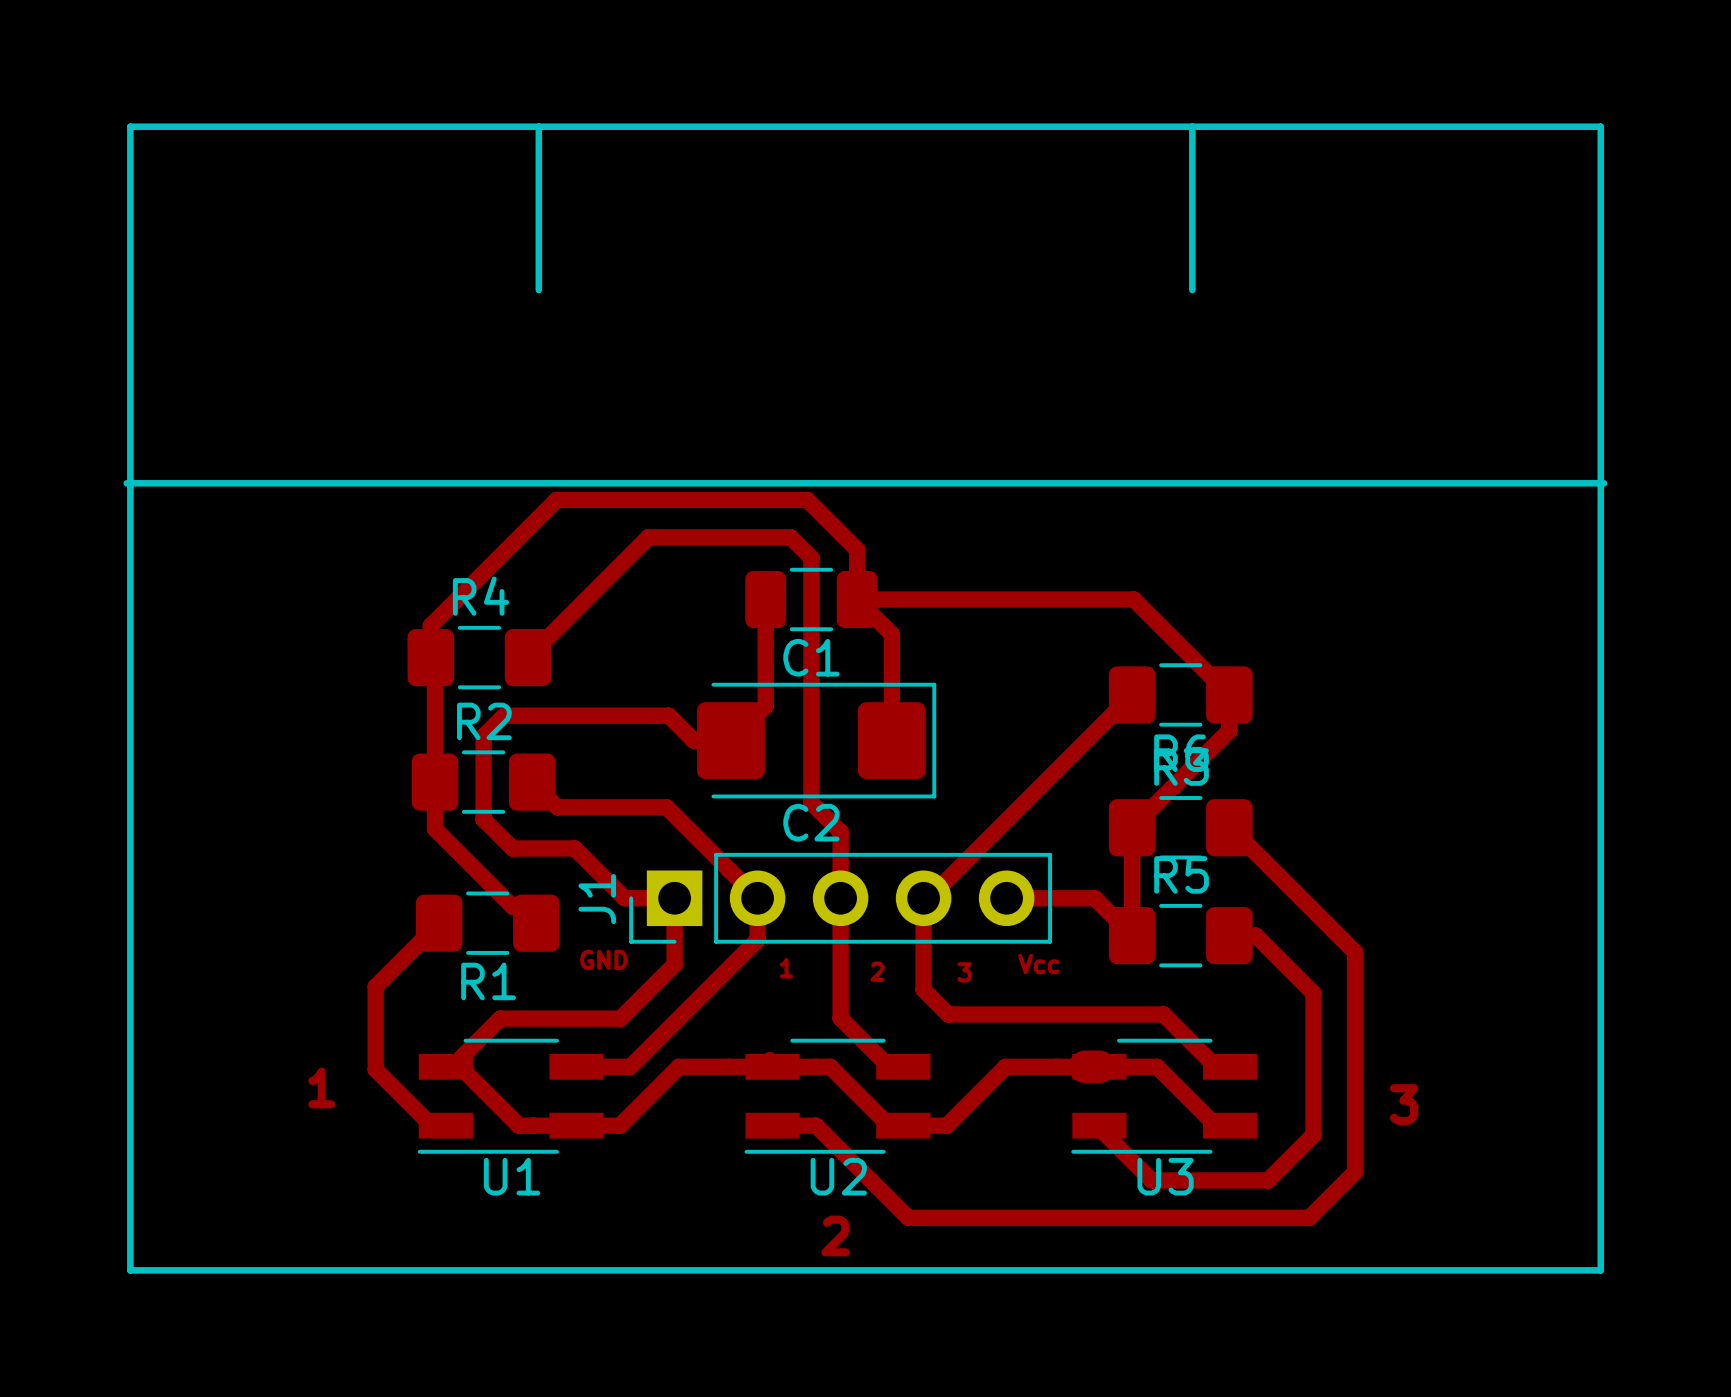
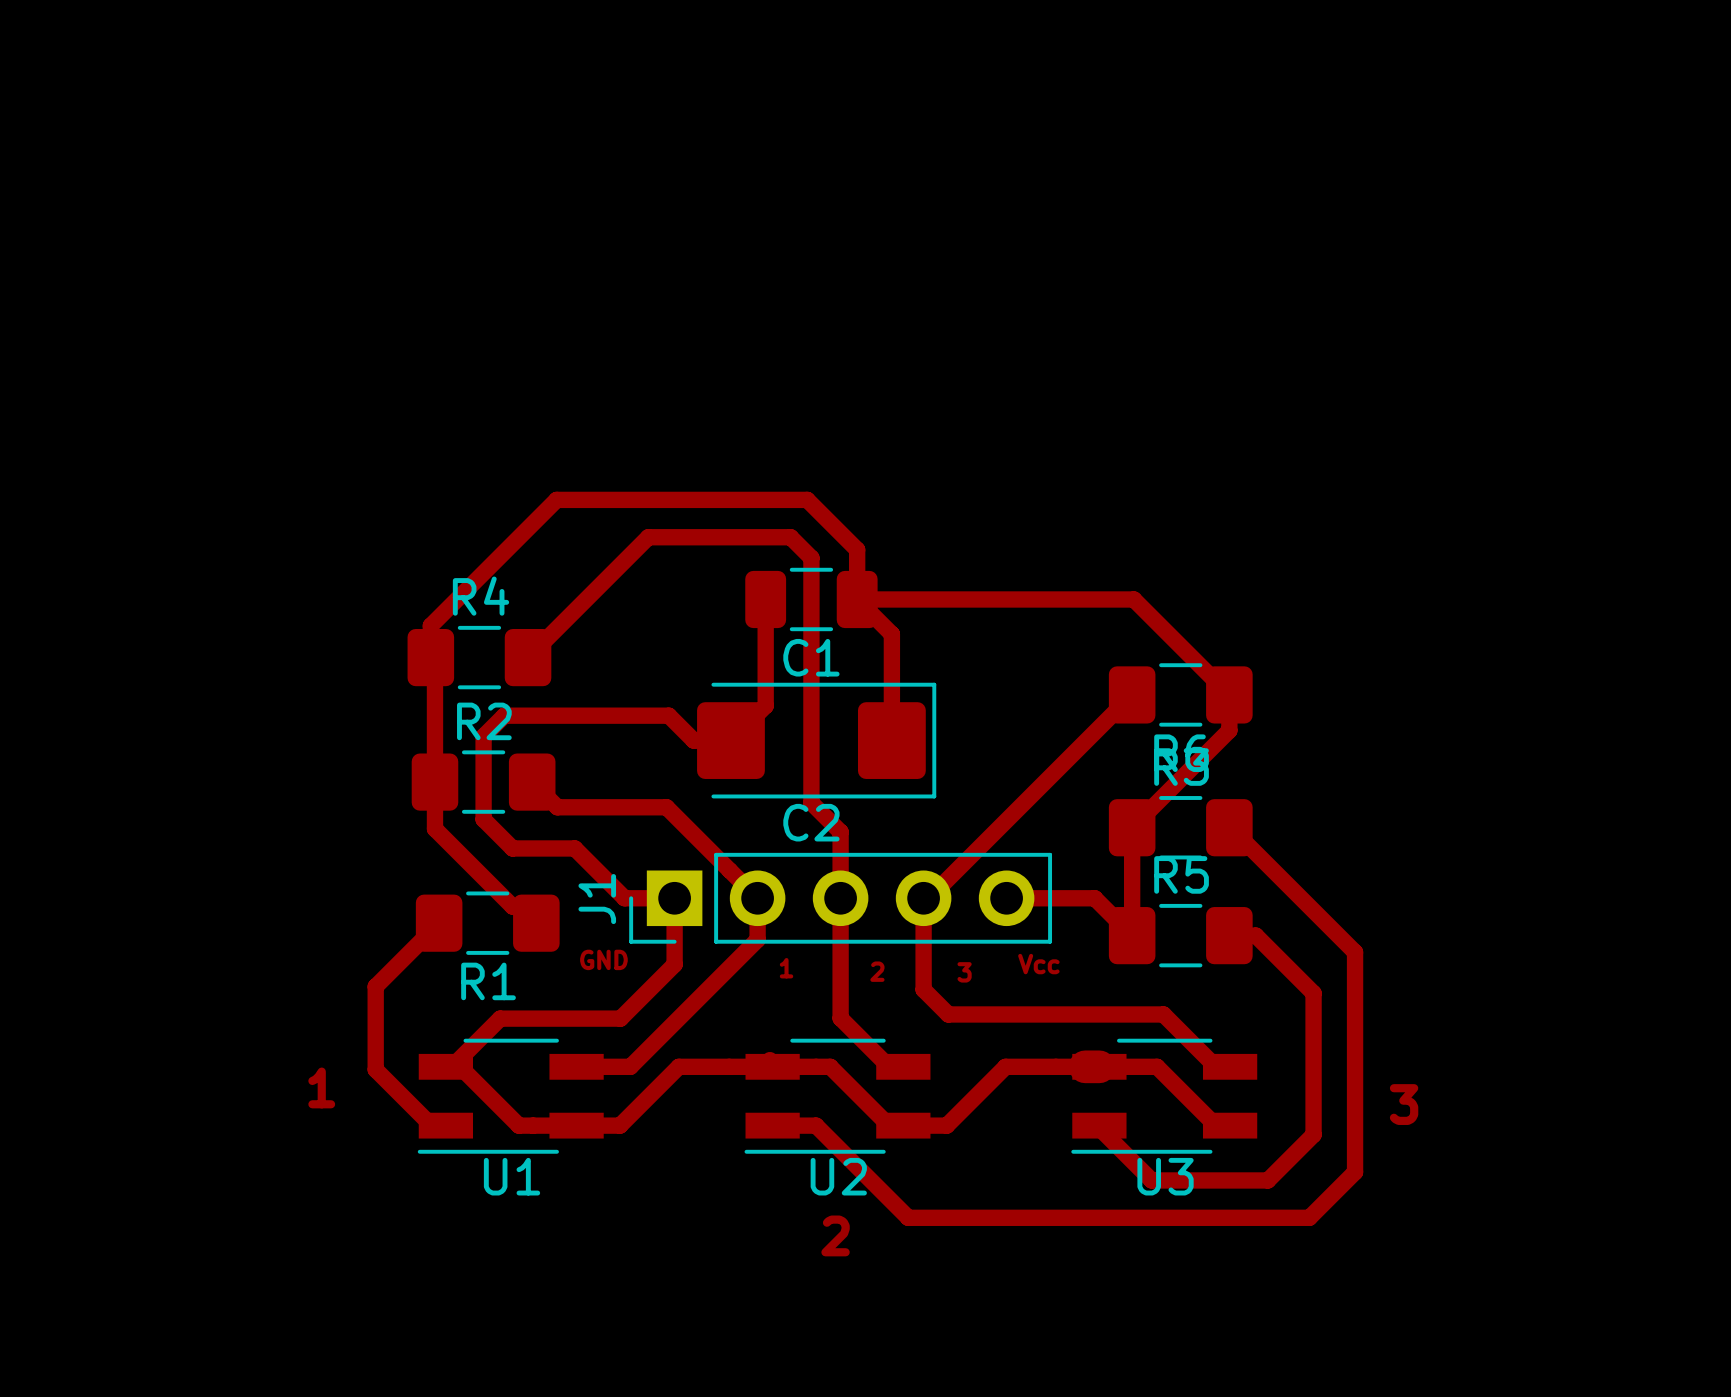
line: (130, 126) (130, 1270) (1600, 1270) (1600, 126) (130, 126) -> none
line: (538, 126) (538, 290) -> none
line: (1192, 126) (1192, 290) -> none
line: (126, 483) (1604, 483) -> none

